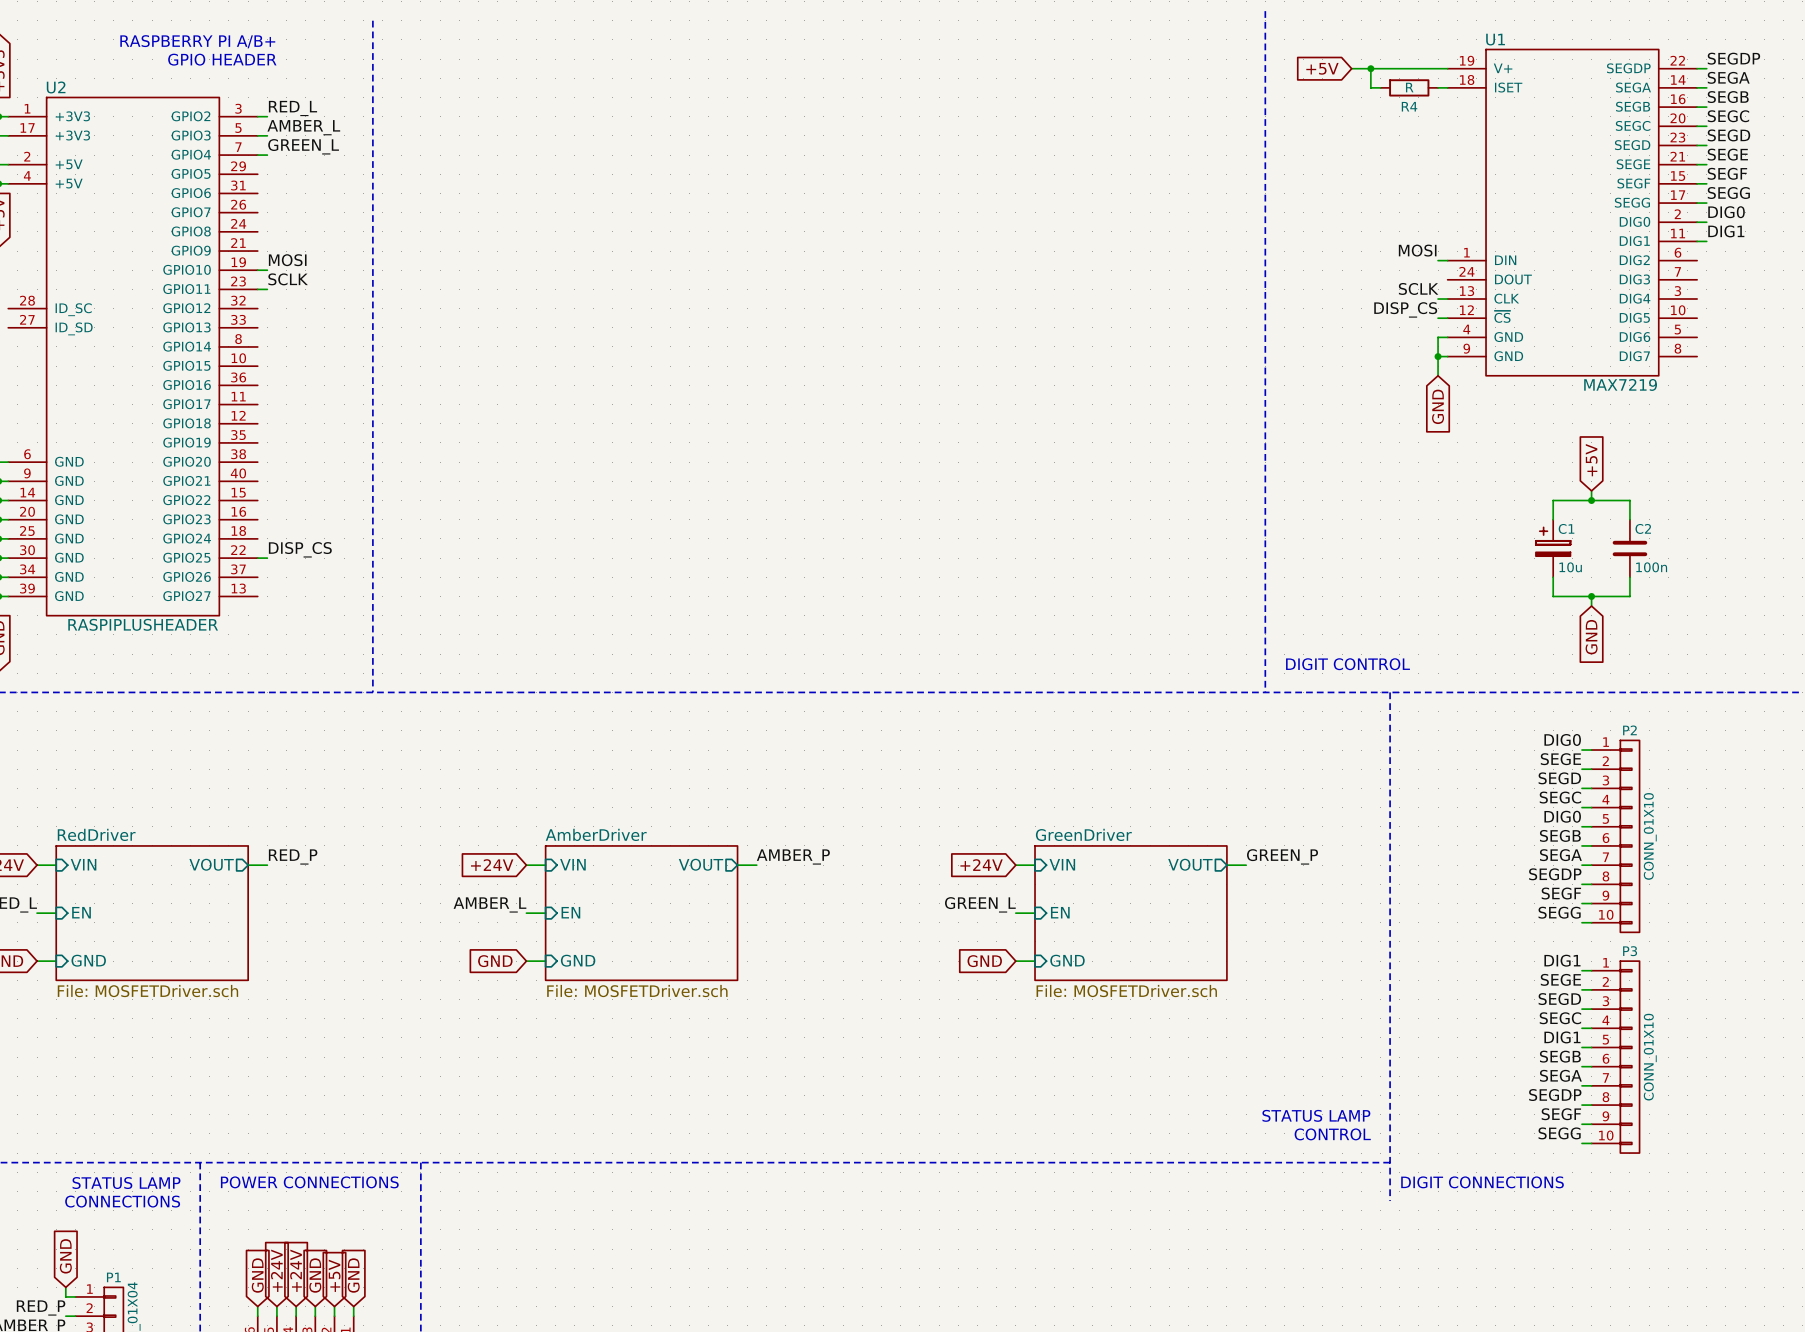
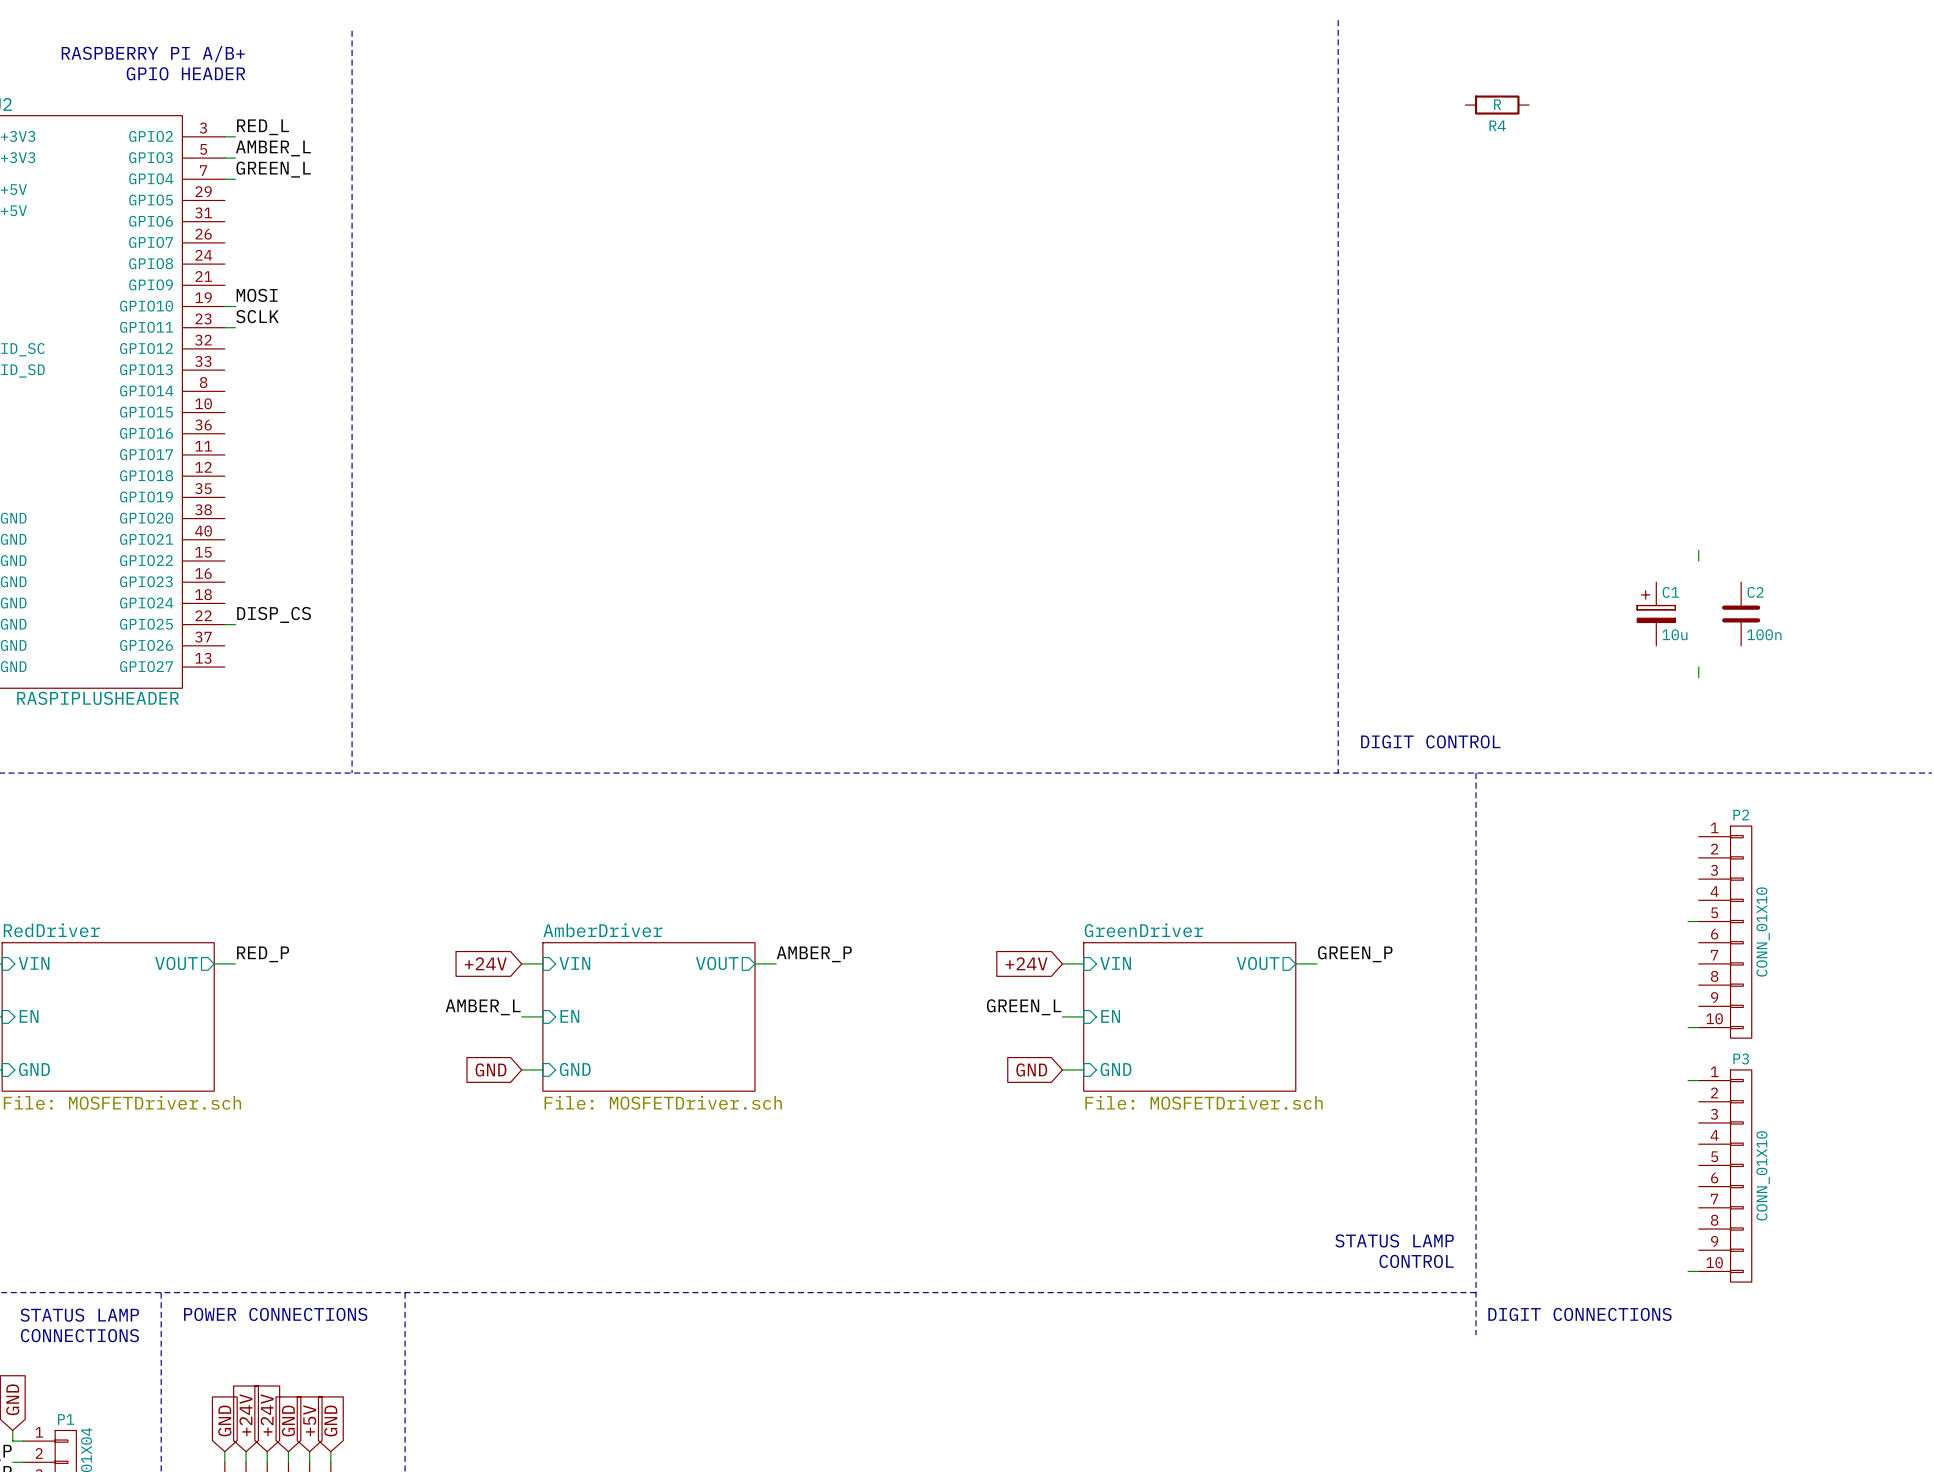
label: SEGDP (1733, 58) -> none
global label: +5V (1322, 68) -> none
wire: (1351, 68) (1447, 68) -> none
wire: (1370, 68) (1370, 87) (1380, 87) -> none
junction: (1370, 68) -> none
wire: (1697, 68) (1706, 68) -> none
label: SEGA (1728, 77) -> none
wire: (1438, 87) (1447, 87) -> none
wire: (1697, 87) (1706, 87) -> none
label: SEGB (1728, 97) -> none
wire: (1697, 107) (1706, 107) -> none
label: SEGC (1728, 116) -> none
wire: (1697, 126) (1706, 126) -> none
label: SEGD (1728, 135) -> none
wire: (1697, 145) (1706, 145) -> none
label: SEGE (1727, 154) -> none
wire: (1697, 164) (1706, 164) -> none
label: SEGF (1727, 173) -> none
wire: (1697, 183) (1706, 183) -> none
label: SEGG (1728, 193) -> none
wire: (1697, 203) (1706, 203) -> none
U1: MAX7219 (1572, 212) -> none
label: DIG0 (1726, 212) -> none
wire: (1697, 222) (1706, 222) -> none
label: DIG1 (1726, 231) -> none
wire: (1697, 241) (1706, 241) -> none
label: MOSI (1417, 250) -> none
wire: (1438, 260) (1447, 260) -> none
label: SCLK (1418, 288) -> none
wire: (1438, 299) (1447, 299) -> none
label: DISP_CS (1405, 309) -> none
wire: (1438, 318) (1447, 318) -> none
wire: (1447, 337) (1438, 337) (1438, 375) -> none
wire: (1438, 356) (1447, 356) -> none
junction: (1438, 356) -> none
global label: GND (1438, 406) -> none
global label: +5V (1591, 460) -> none
junction: (1591, 500) -> none
wire: (1553, 519) (1553, 500) (1629, 500) (1629, 519) -> none
wire: (1553, 577) (1553, 596) (1629, 596) (1629, 577) -> none
junction: (1591, 596) -> none
global label: GND (1591, 637) -> none
label: DIG0 (1562, 739) -> none
wire: (1581, 750) (1591, 750) -> none
label: SEGE (1560, 759) -> none
wire: (1581, 769) (1591, 769) -> none
label: SEGD (1559, 778) -> none
wire: (1581, 788) (1591, 788) -> none
label: SEGC (1560, 797) -> none
wire: (1581, 807) (1591, 807) -> none
label: DIG0 (1562, 816) -> none
label: SEGB (1560, 835) -> none
wire: (1581, 845) (1591, 845) -> none
label: SEGA (1560, 855) -> none
wire: (1581, 865) (1591, 865) -> none
label: SEGDP (1555, 874) -> none
wire: (1581, 884) (1591, 884) -> none
label: SEGF (1561, 893) -> none
wire: (1581, 903) (1591, 903) -> none
label: SEGG (1559, 912) -> none
label: DIG1 (1562, 960) -> none
label: SEGE (1560, 979) -> none
wire: (1581, 989) (1591, 989) -> none
label: SEGD (1559, 999) -> none
wire: (1581, 1009) (1591, 1009) -> none
label: SEGC (1560, 1018) -> none
wire: (1581, 1028) (1591, 1028) -> none
label: DIG1 (1562, 1037) -> none
wire: (1581, 1047) (1591, 1047) -> none
label: SEGB (1560, 1056) -> none
wire: (1581, 1066) (1591, 1066) -> none
label: SEGA (1560, 1075) -> none
wire: (1581, 1085) (1591, 1085) -> none
label: SEGDP (1555, 1095) -> none
wire: (1581, 1105) (1591, 1105) -> none
label: SEGF (1561, 1114) -> none
wire: (1581, 1124) (1591, 1124) -> none
label: SEGG (1559, 1133) -> none

